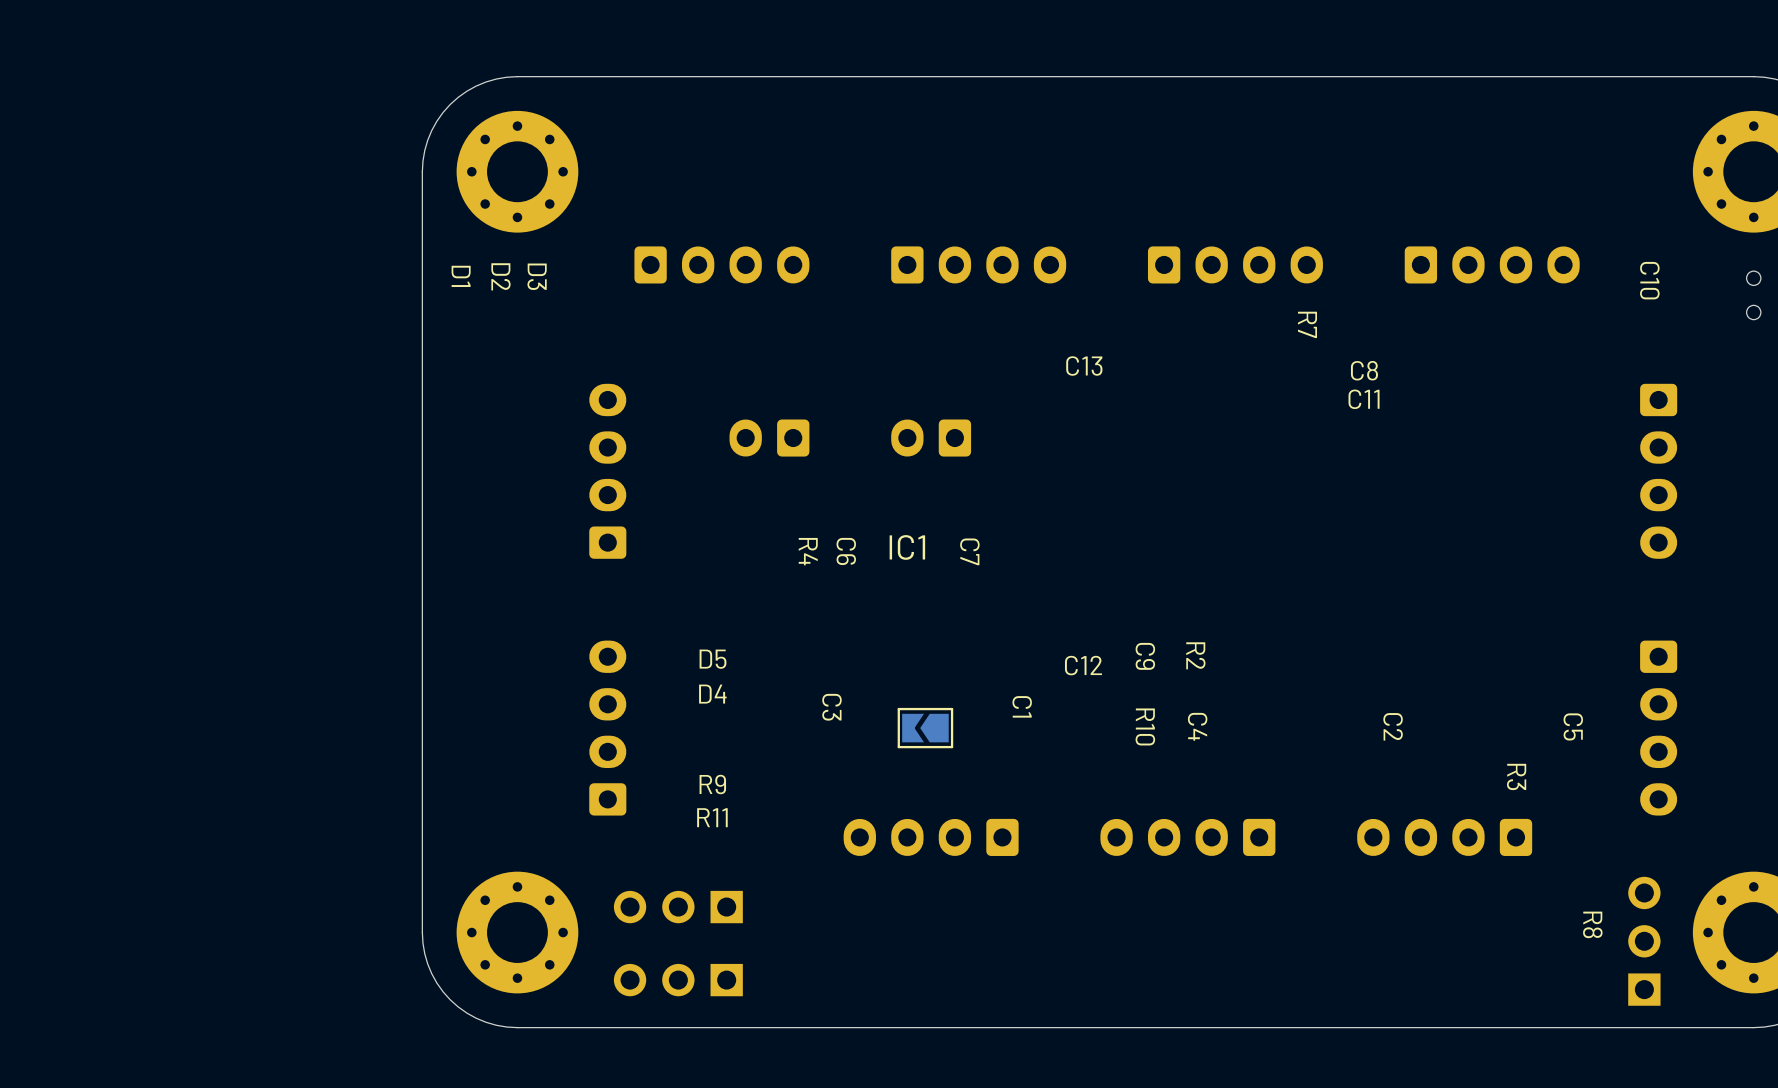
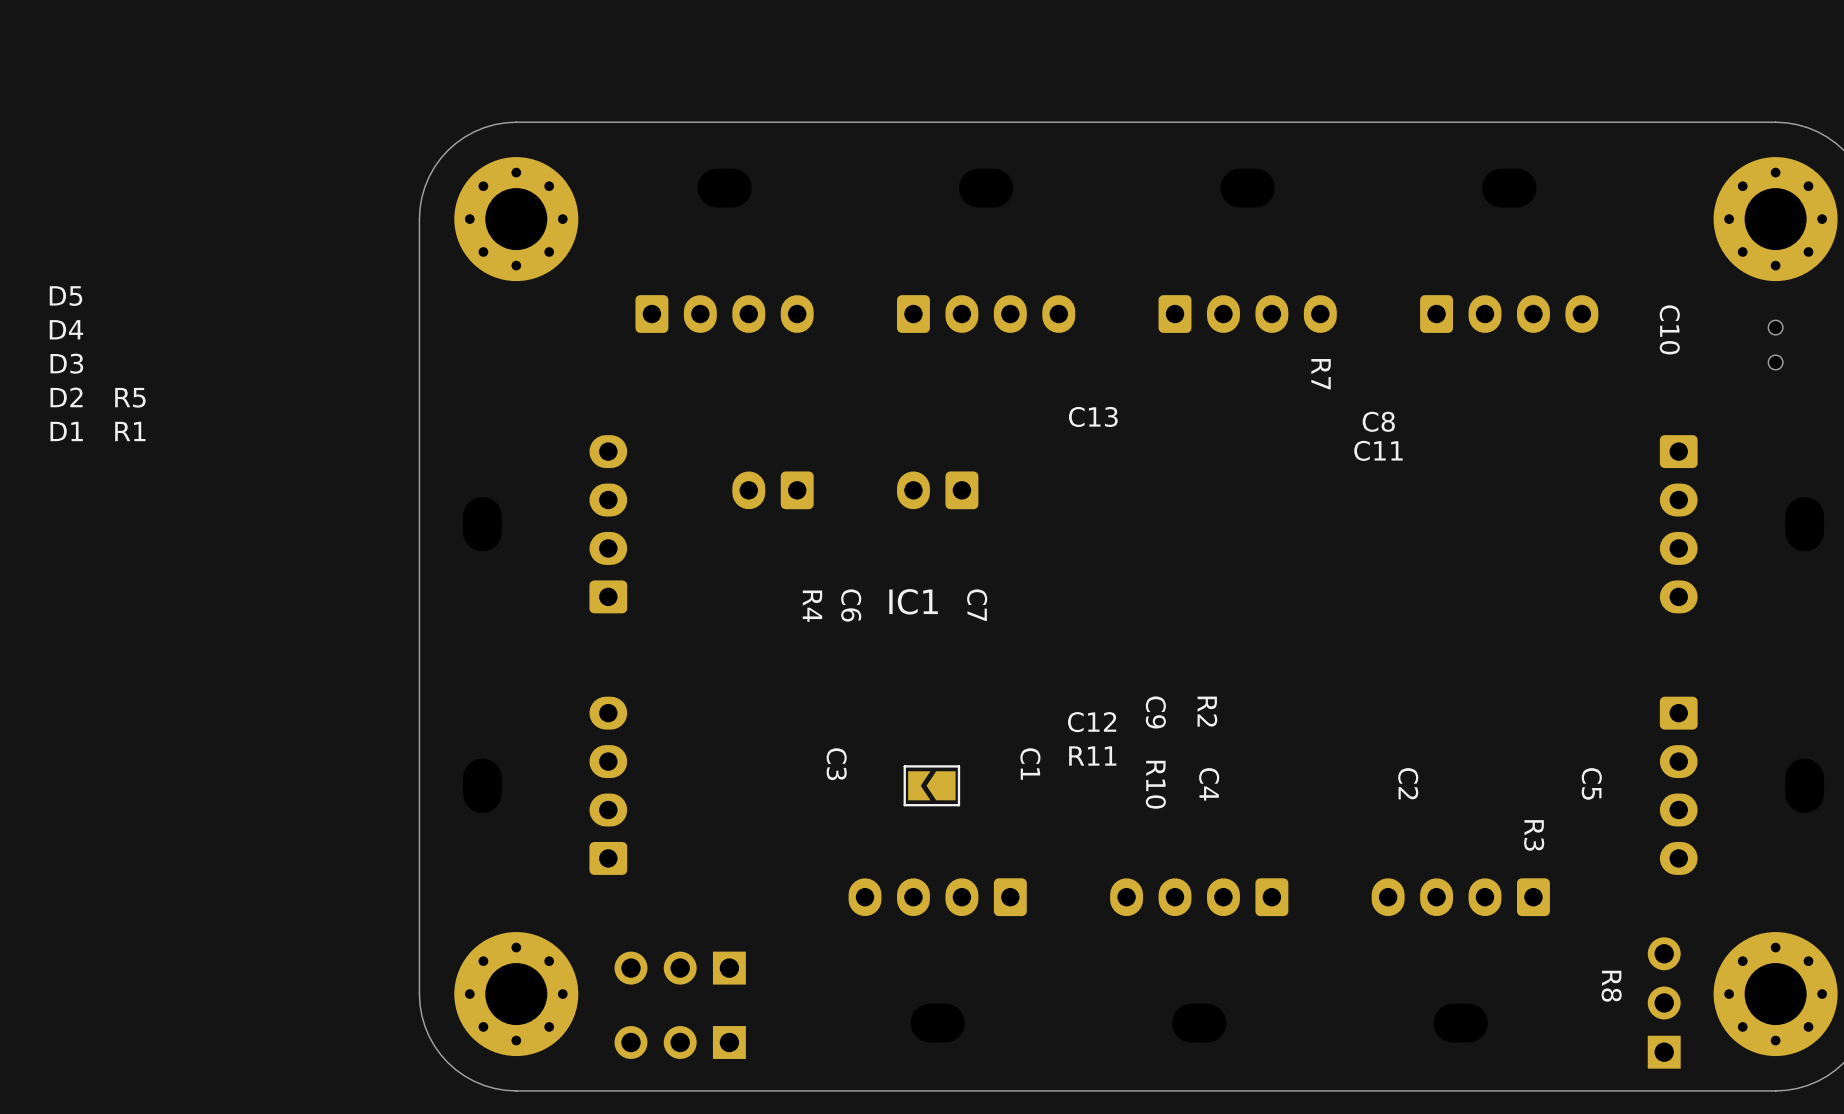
D1 position: (461, 276) -> (66, 431)
D1 name rotation: 0° (461, 276) -> 90° counterclockwise (66, 431)
D2 position: (500, 276) -> (66, 397)
D2 name rotation: 0° (500, 276) -> 90° counterclockwise (66, 397)
D3 position: (537, 276) -> (66, 363)
D3 name rotation: 0° (537, 276) -> 90° counterclockwise (66, 363)
R5: none -> (130, 397)
R1: none -> (130, 431)
D5 position: (713, 659) -> (65, 296)
D4 position: (712, 694) -> (66, 329)
R9: (712, 784) -> none
R11 position: (712, 817) -> (1092, 756)

